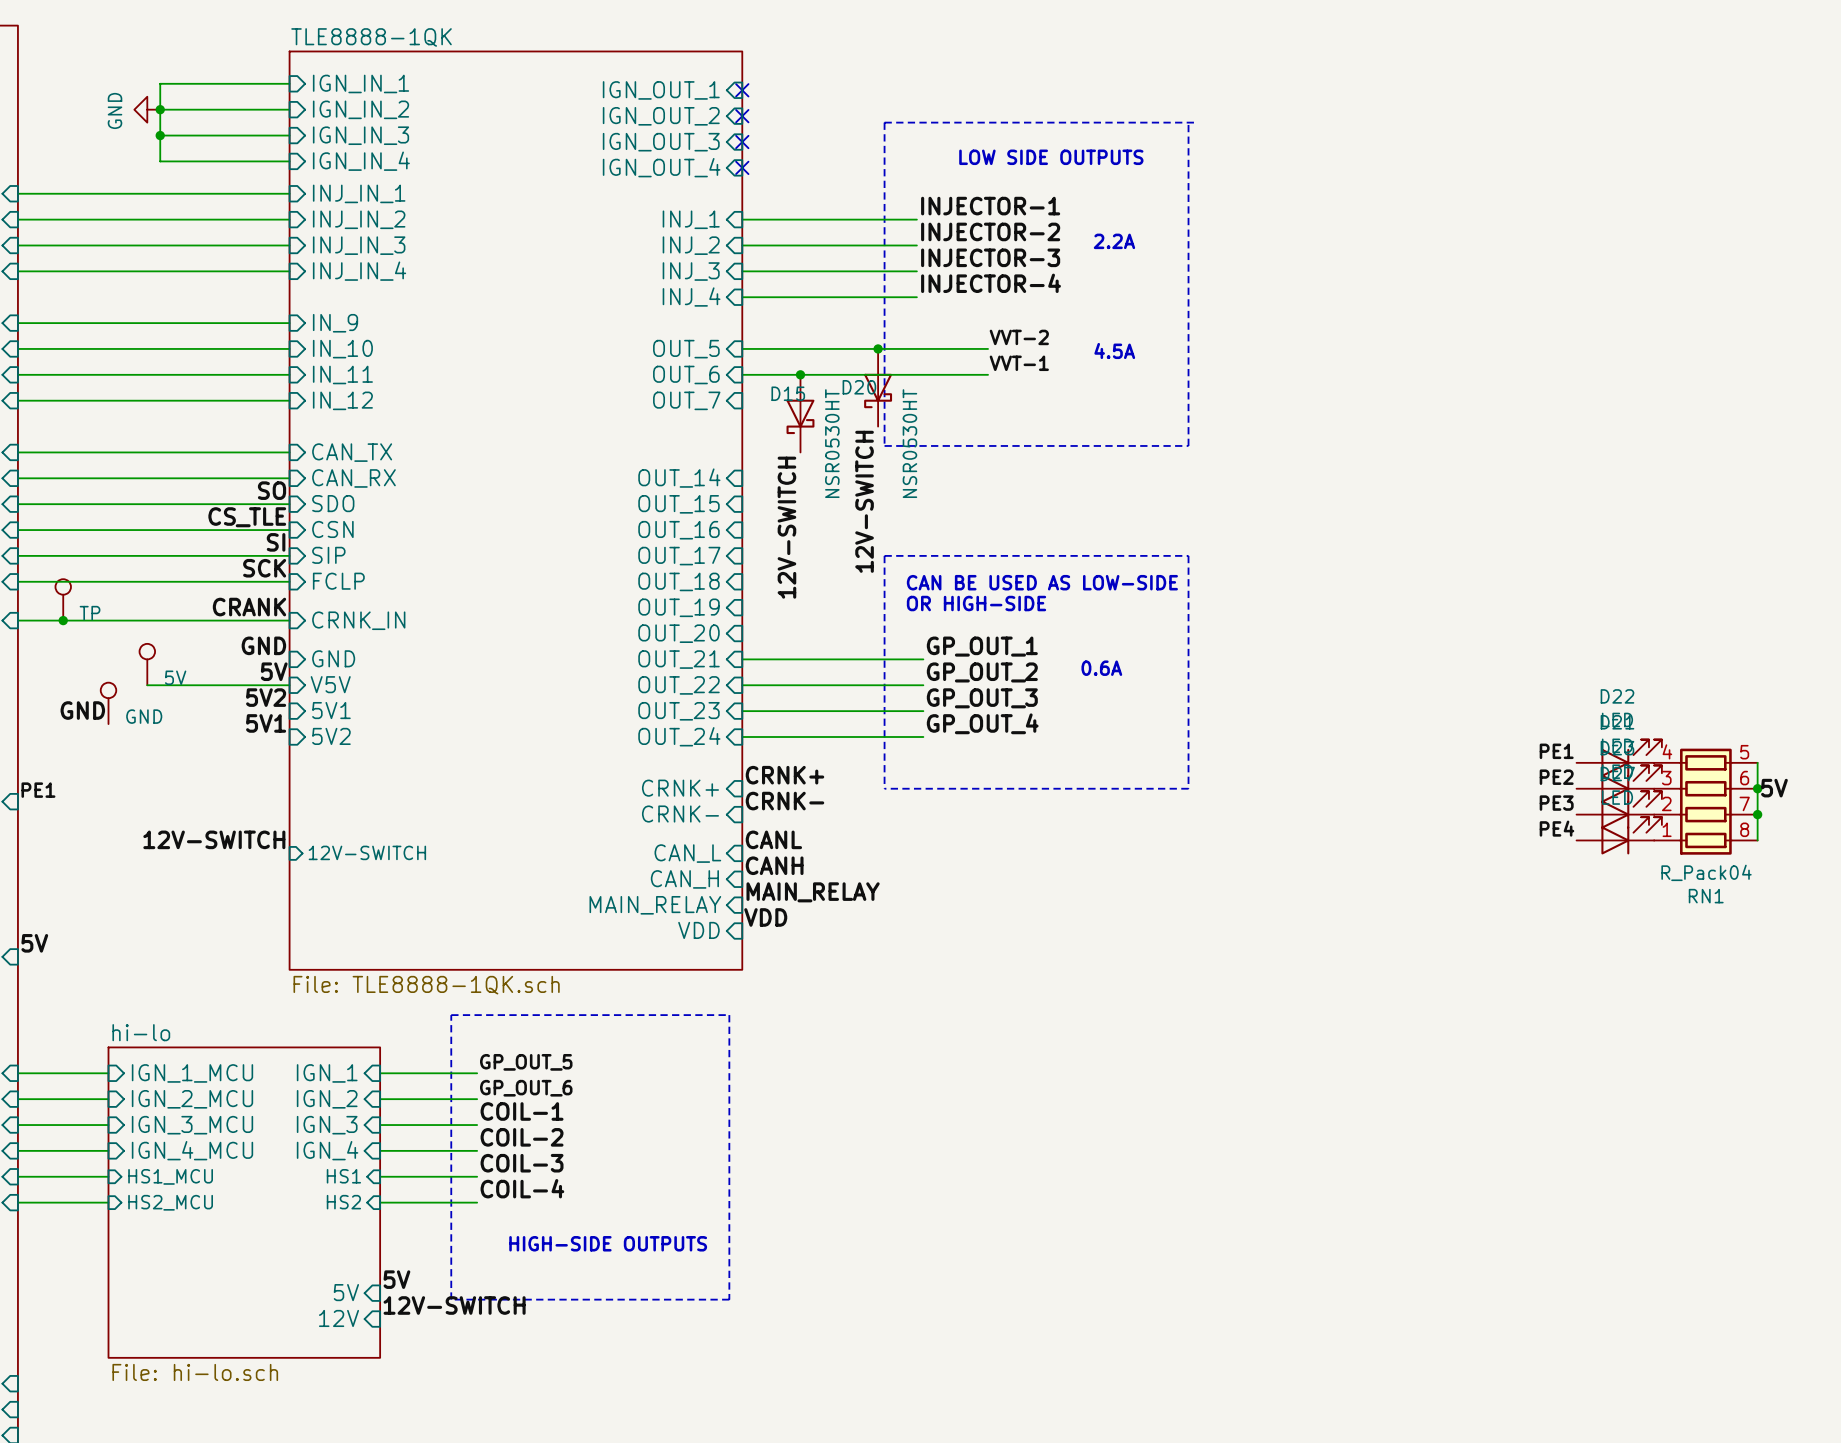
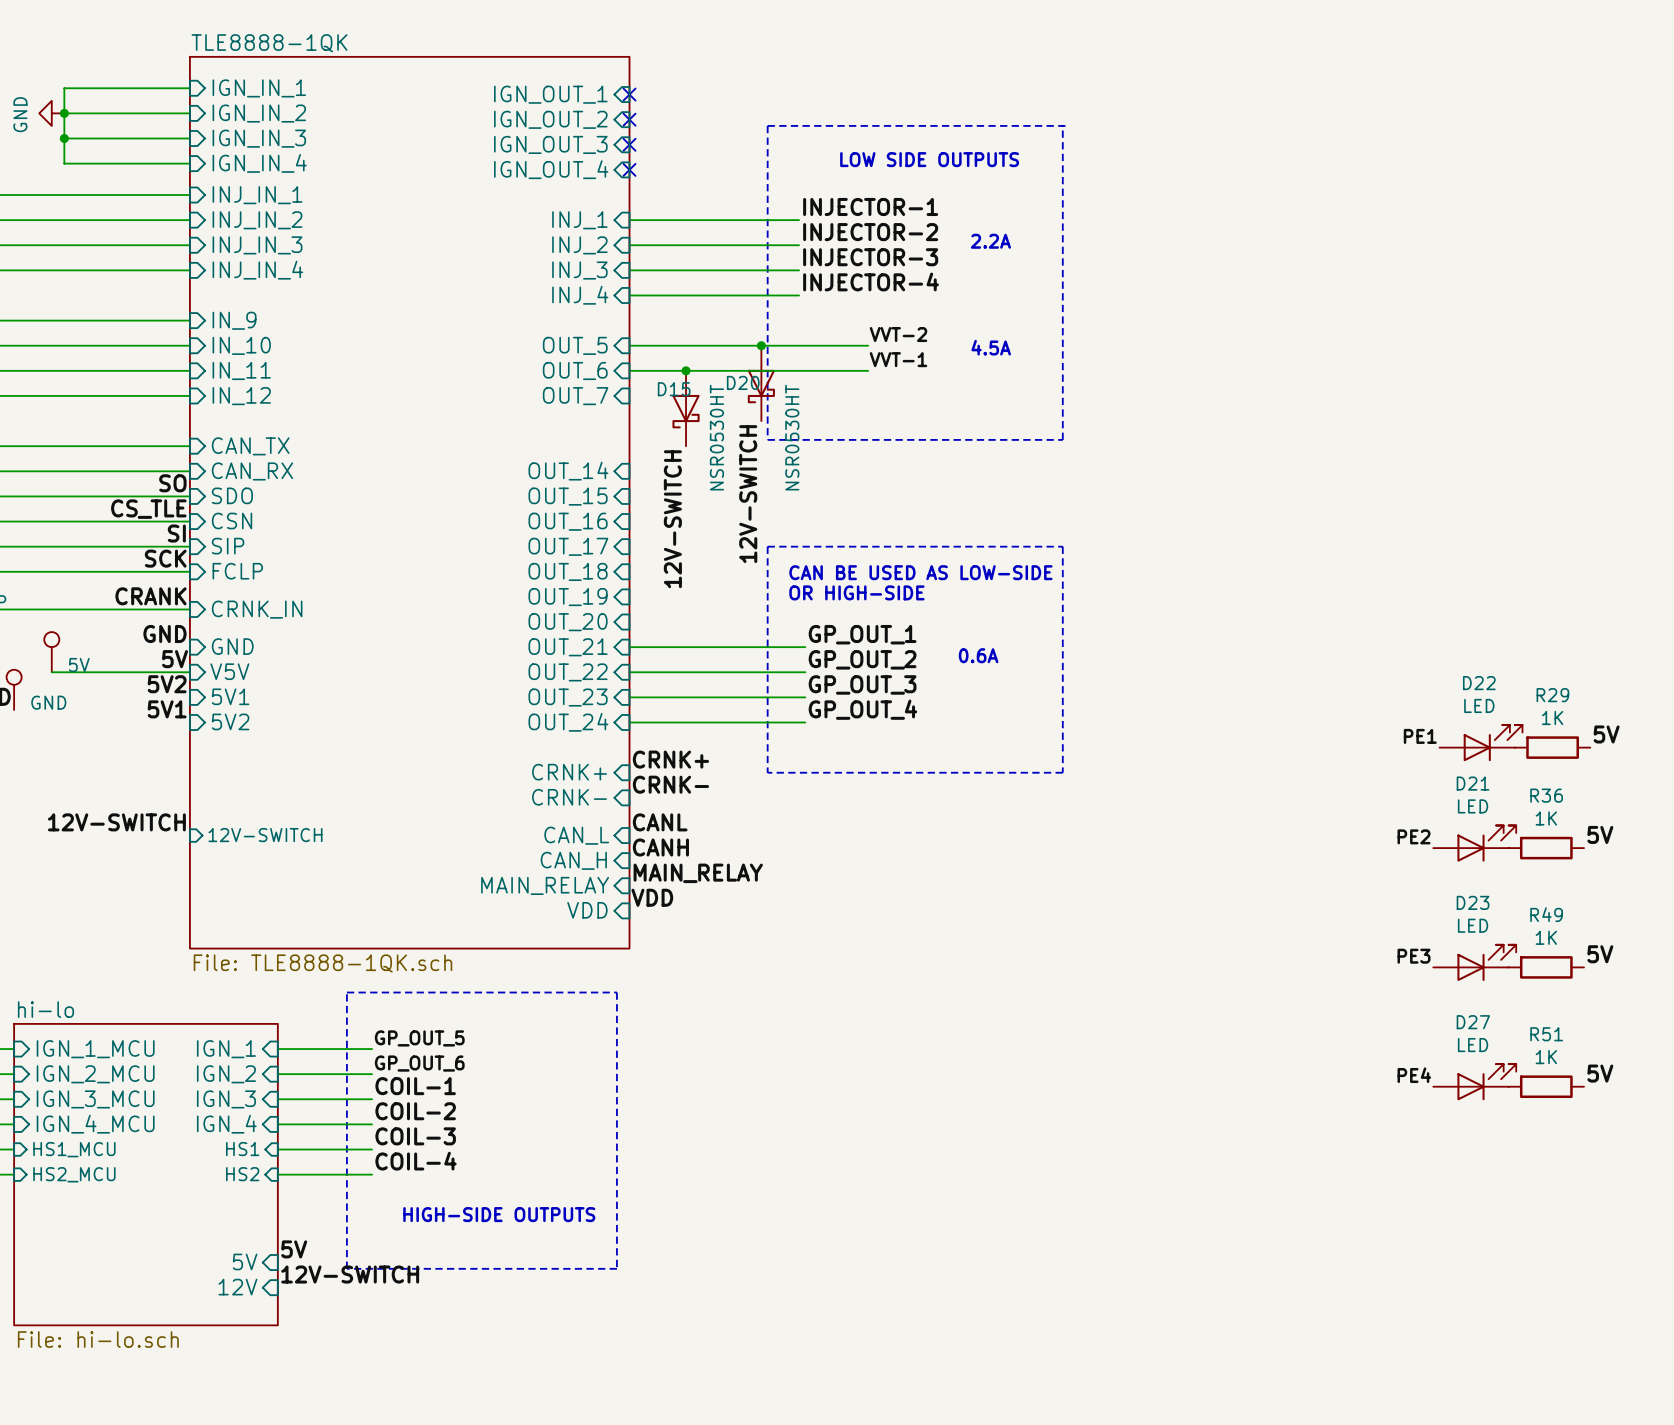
label: none -> 5V (1606, 734)
R29: none -> 1K (1552, 747)
wire: (1757, 762) (1757, 840) -> none
label position: PE2 (1556, 777) -> PE2 (1414, 836)
D21 position: (1619, 784) -> (1474, 843)
junction: (1757, 788) -> none
label: 5V (1774, 788) -> none
RN1: R_Pack04 (1705, 801) -> none
label position: PE3 (1556, 803) -> PE3 (1414, 956)
D23 position: (1619, 809) -> (1474, 962)
junction: (1757, 814) -> none
label: PE4 (1556, 828) -> none
D27 position: (1619, 835) -> (1474, 1082)
label: none -> 5V (1600, 834)
R36: none -> 1K (1546, 848)
label: none -> 5V (1600, 954)
R49: none -> 1K (1546, 967)
label: none -> 5V (1600, 1073)
label: none -> PE4 (1414, 1075)
R51: none -> 1K (1546, 1086)

